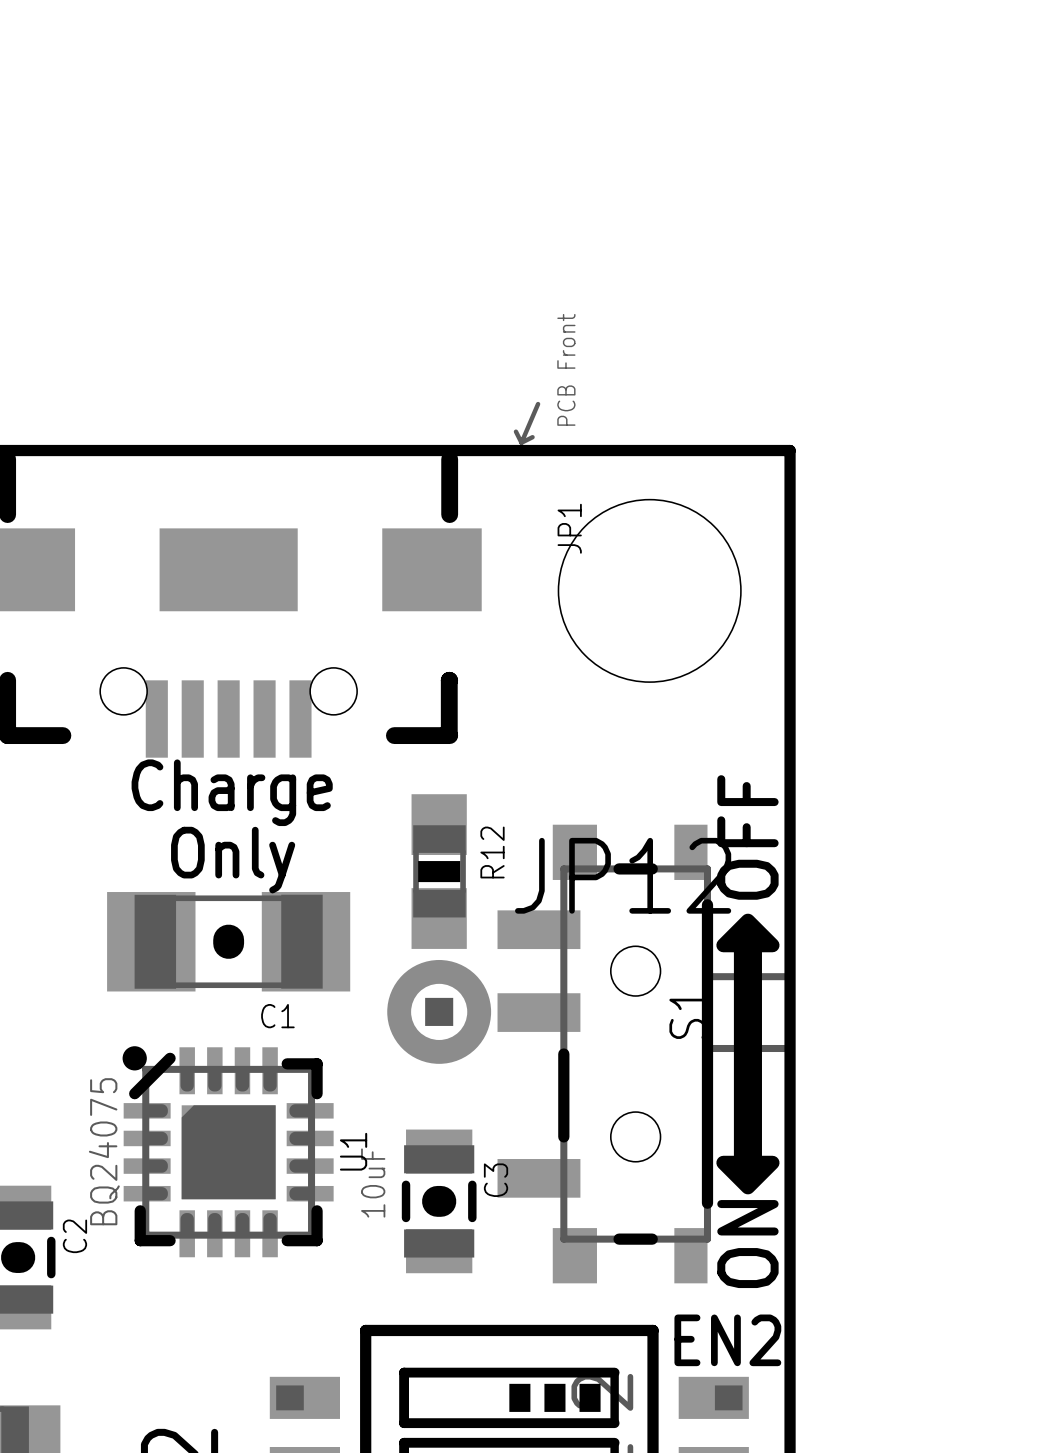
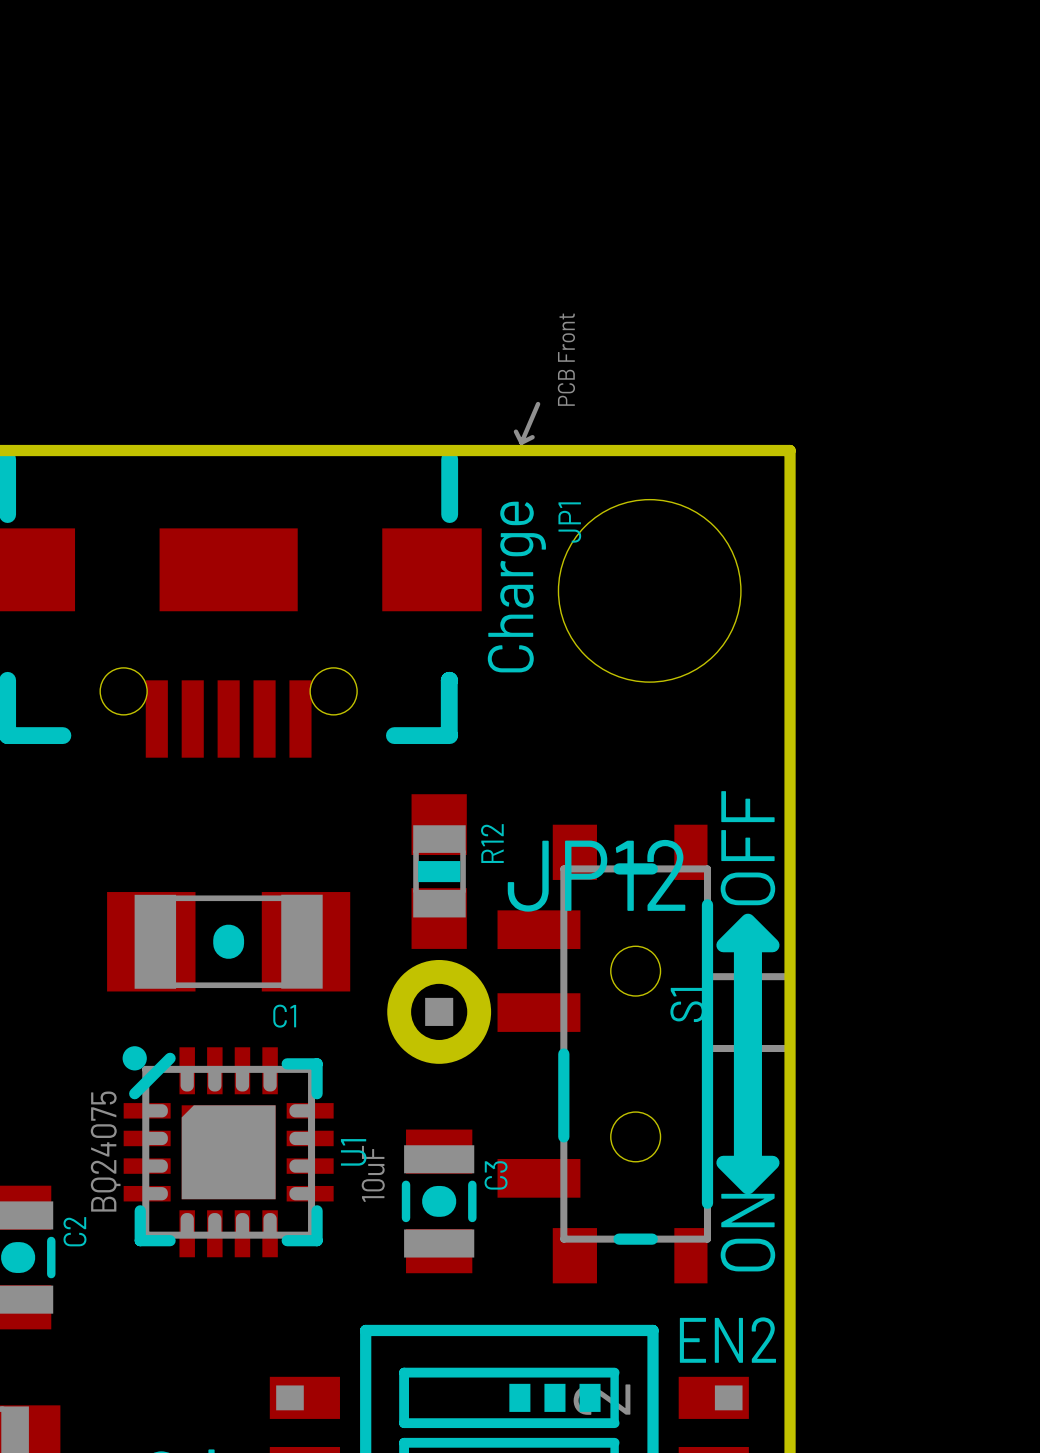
text rotation: 0° (232, 792) -> 90° counterclockwise (516, 587)
text position: Charge (232, 792) -> Charge (516, 587)
text: Only (233, 860) -> none

